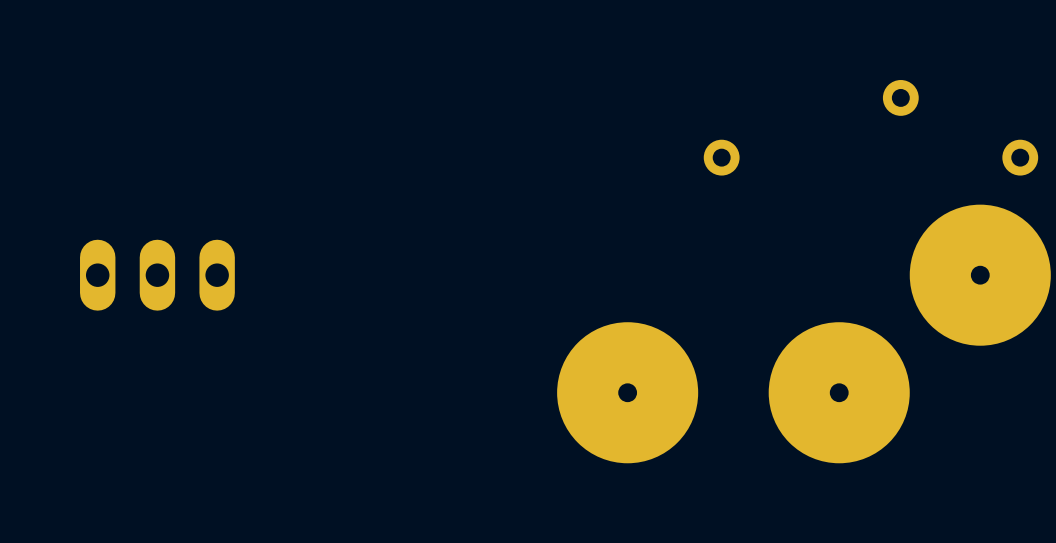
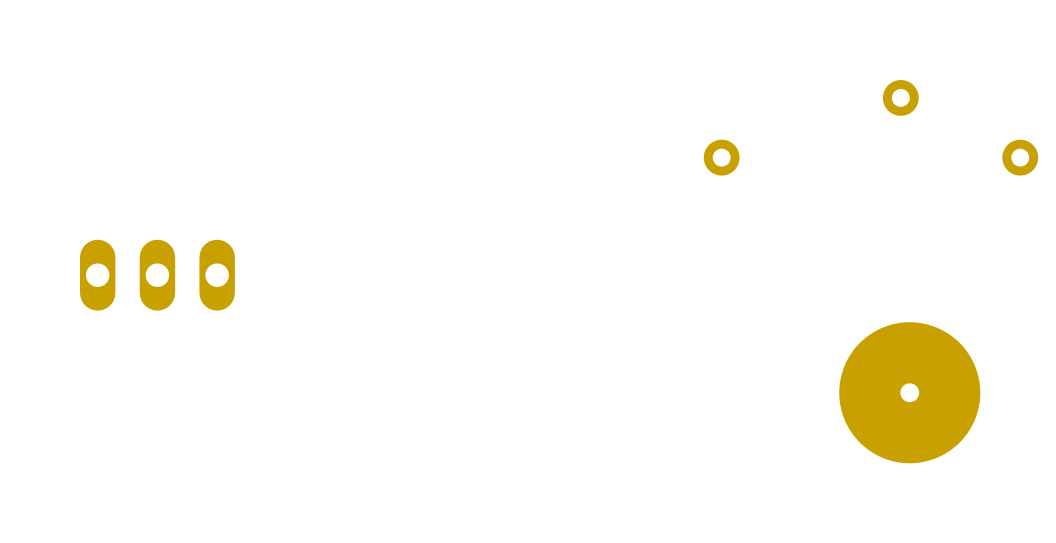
part: (980, 275) -> none
part: (627, 392) -> none
part: (839, 392) -> none
part: none -> (909, 392)

